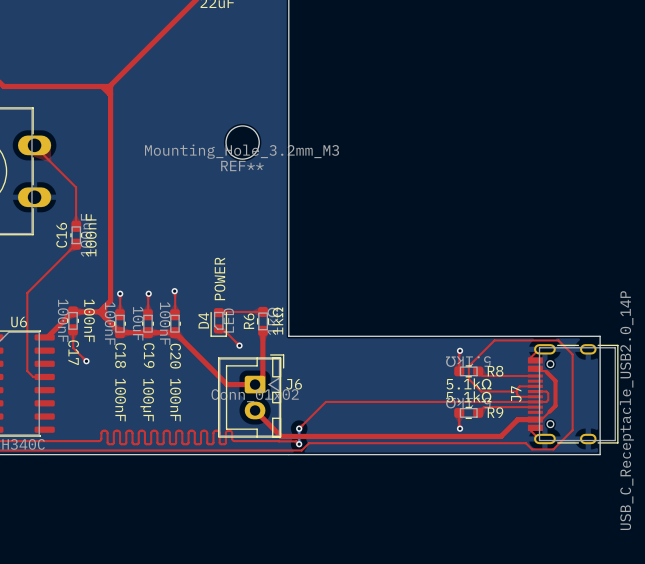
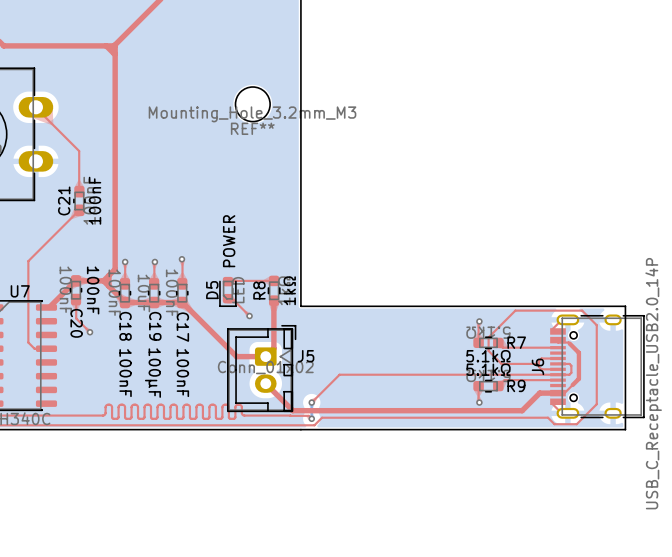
C16 name: C16 (61, 235) -> C21 (64, 200)
D4 name: D4 (203, 320) -> D5 (212, 290)
R6 name: R6 (249, 321) -> R8 (259, 290)
U6 name: U6 (19, 322) -> U7 (20, 291)
C17 name: C17 (73, 352) -> C20 (76, 323)
C20 name: C20 (175, 356) -> C17 (182, 327)
R8 name: R8 (495, 371) -> R7 (516, 342)
J6 name: J6 (294, 384) -> J5 (306, 356)
J7 name: J7 (516, 394) -> J6 (537, 366)

